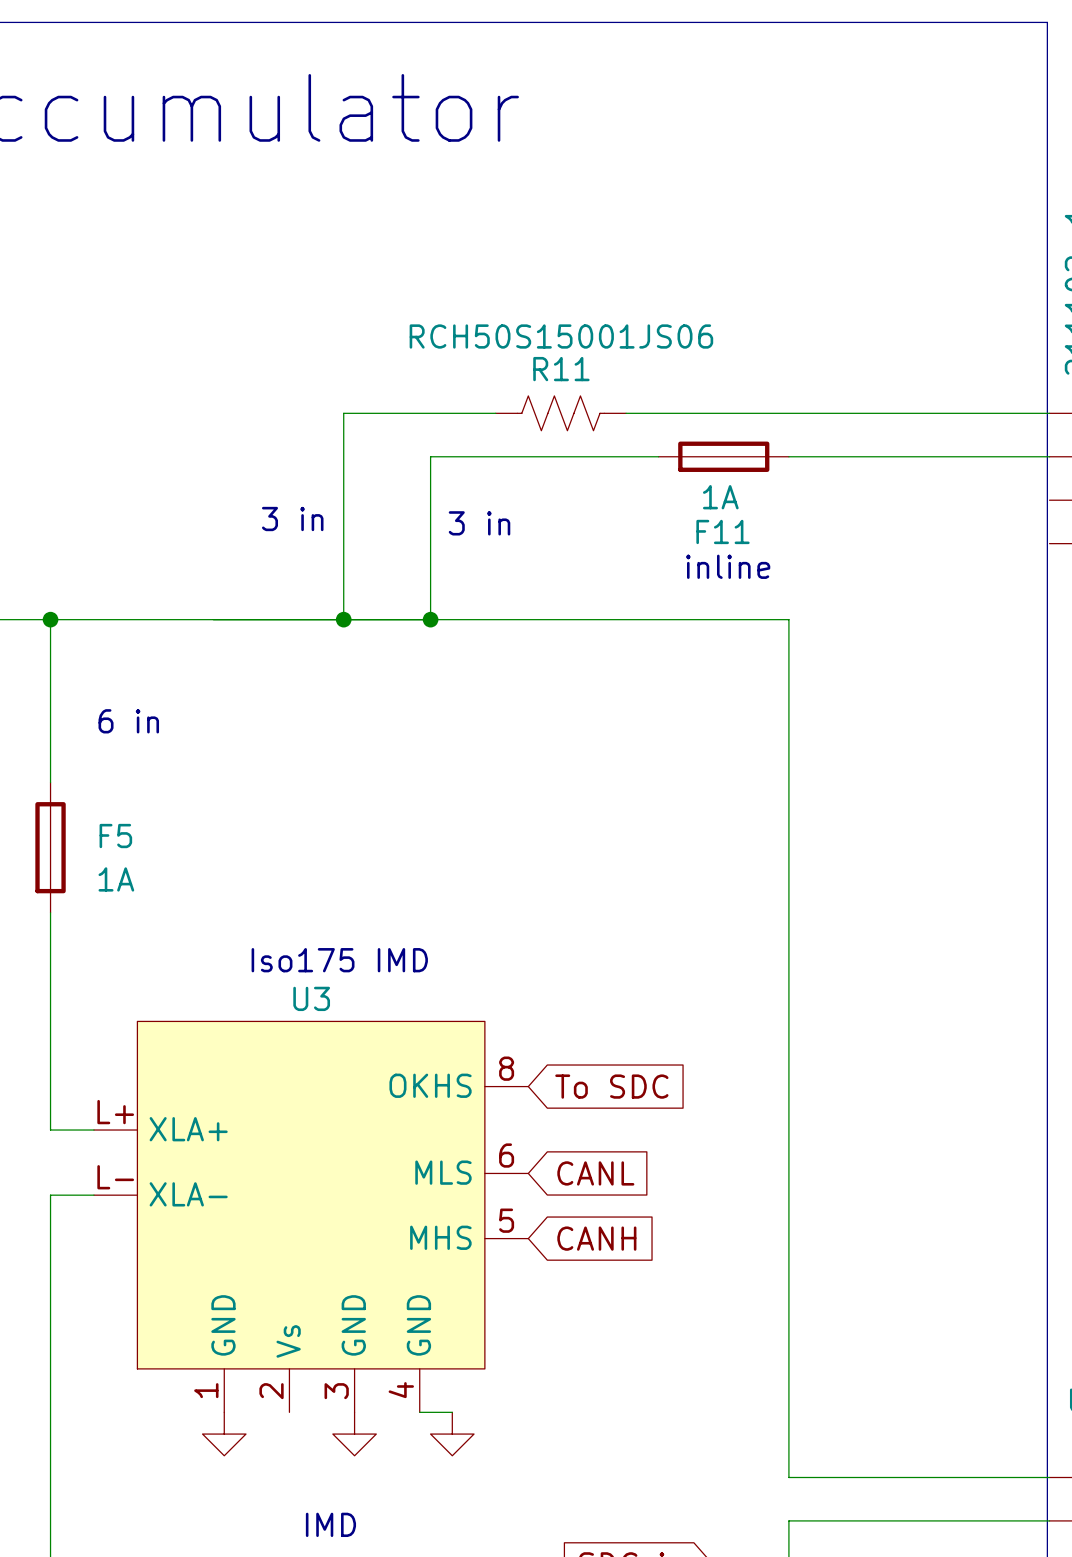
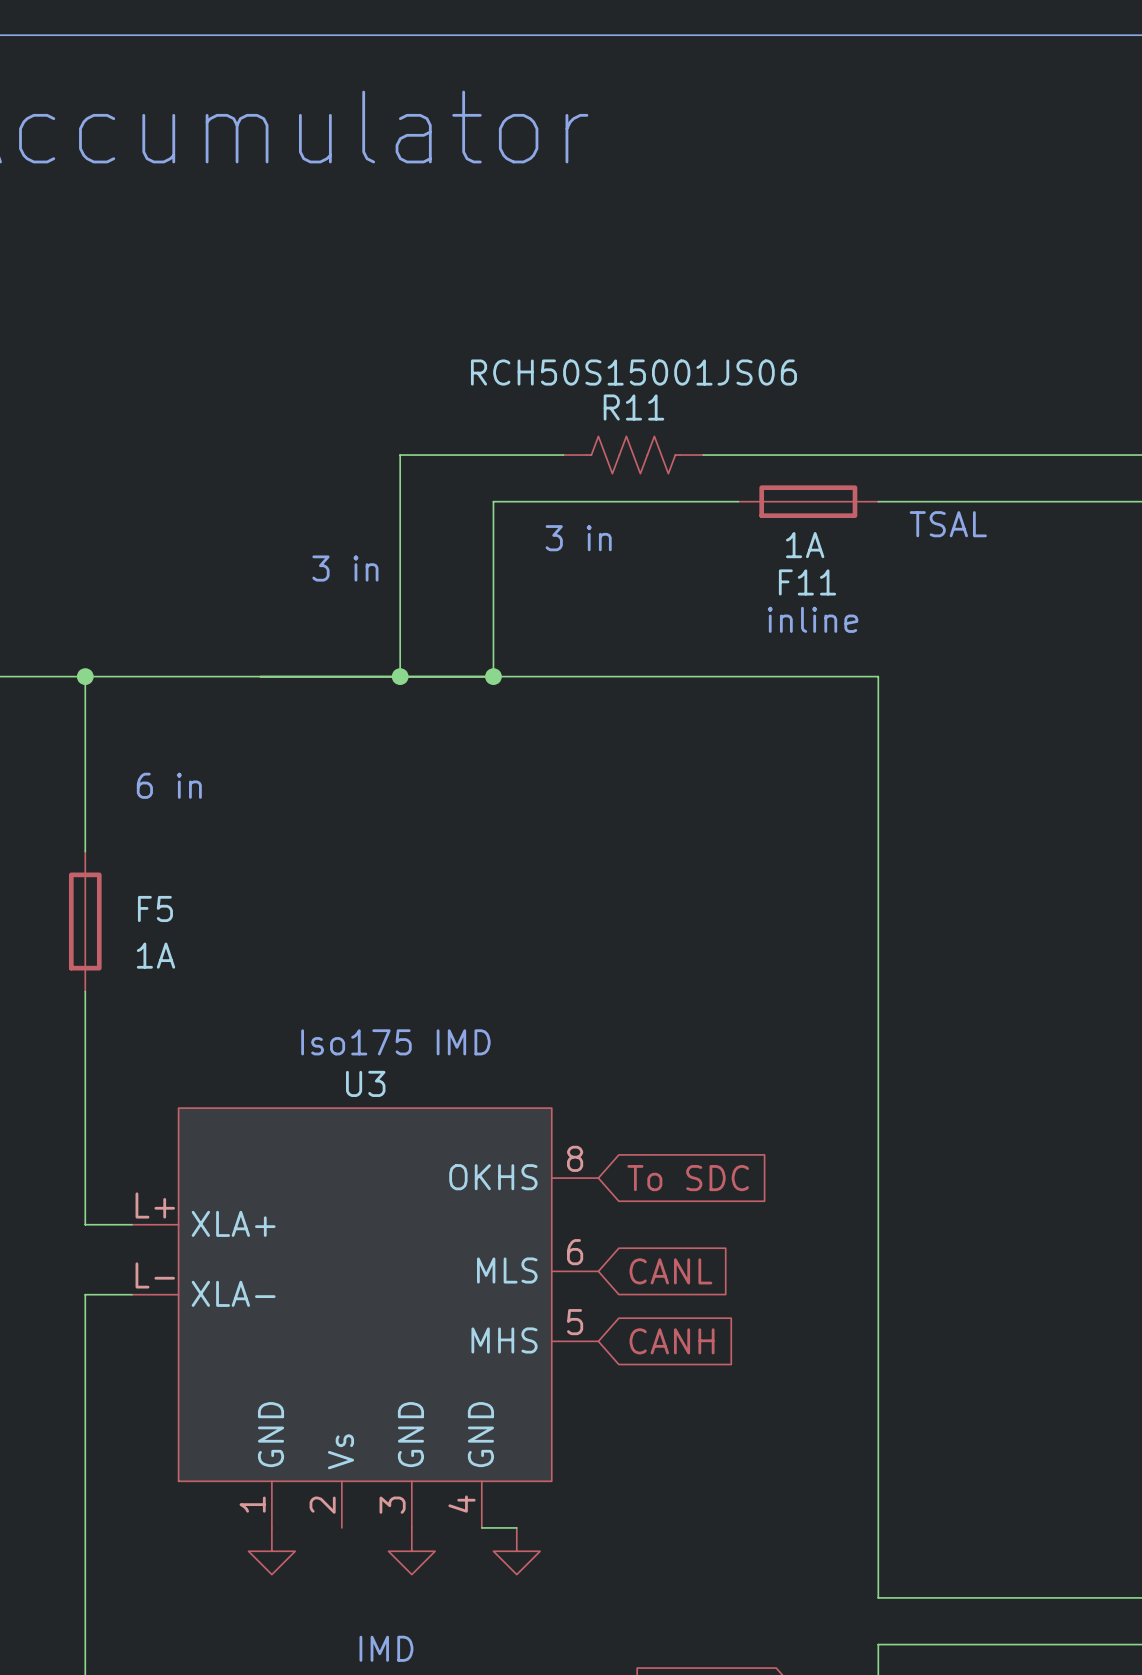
text: none -> TSAL (948, 524)
text position: 3 in (479, 523) -> 3 in (578, 538)

